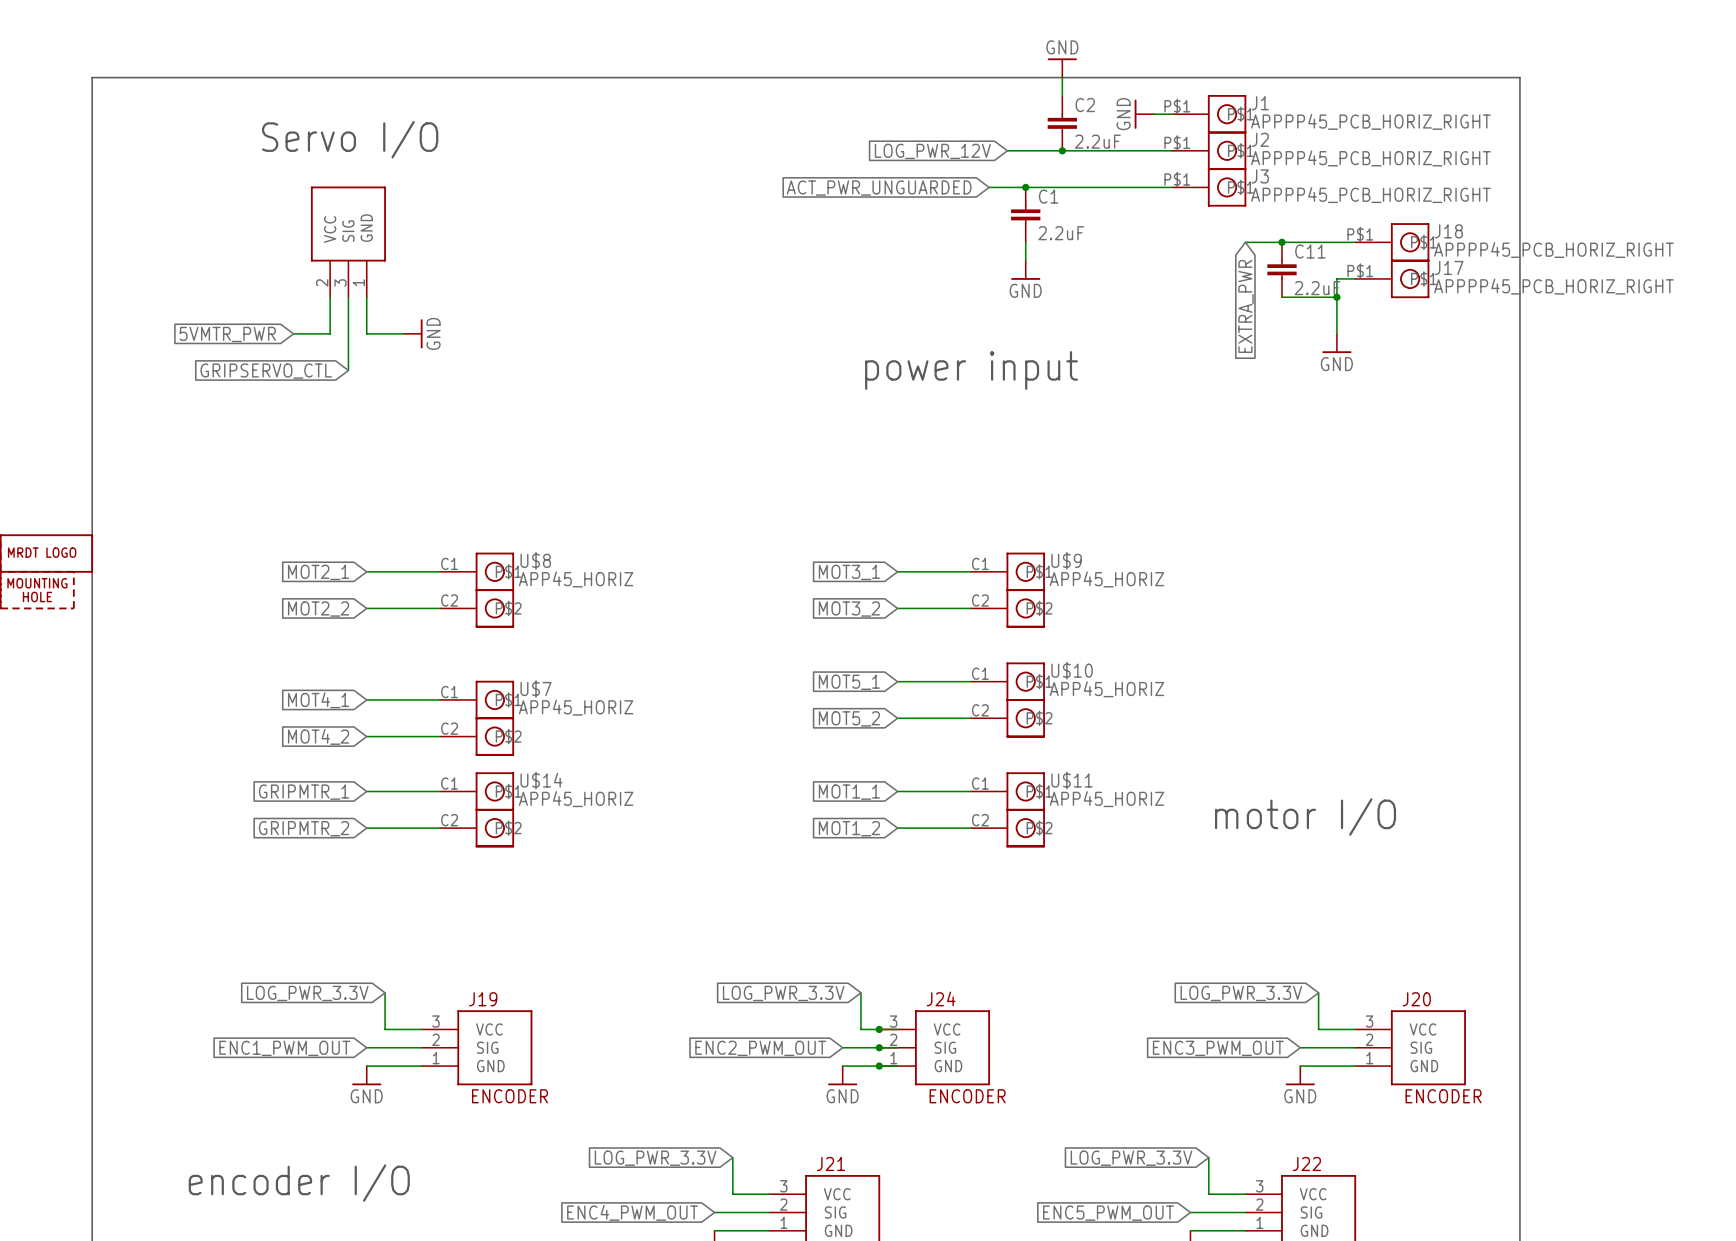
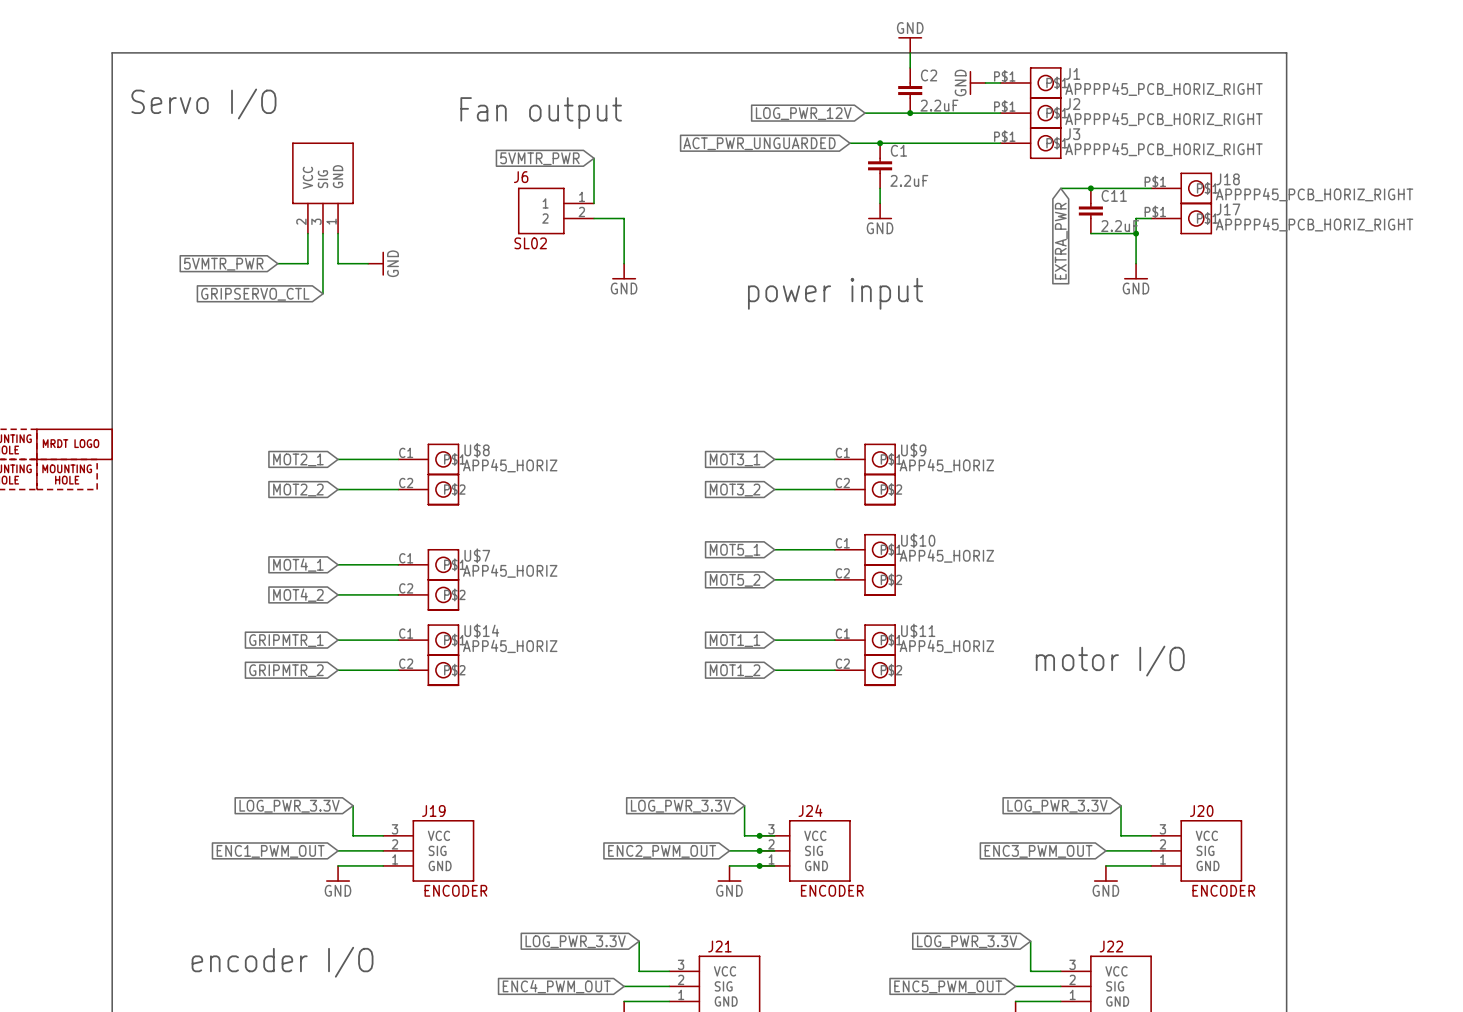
text position: Servo I/O (350, 139) -> Servo I/O (203, 103)
text: none -> Fan output (541, 113)
wire: none -> (594, 158) (594, 203)
global label: none -> 5VMTR_PWR (539, 158)
J6: none -> SL02 (555, 210)
wire: none -> (594, 218) (624, 218) (624, 263)
power symbol: none -> GND (624, 271)

